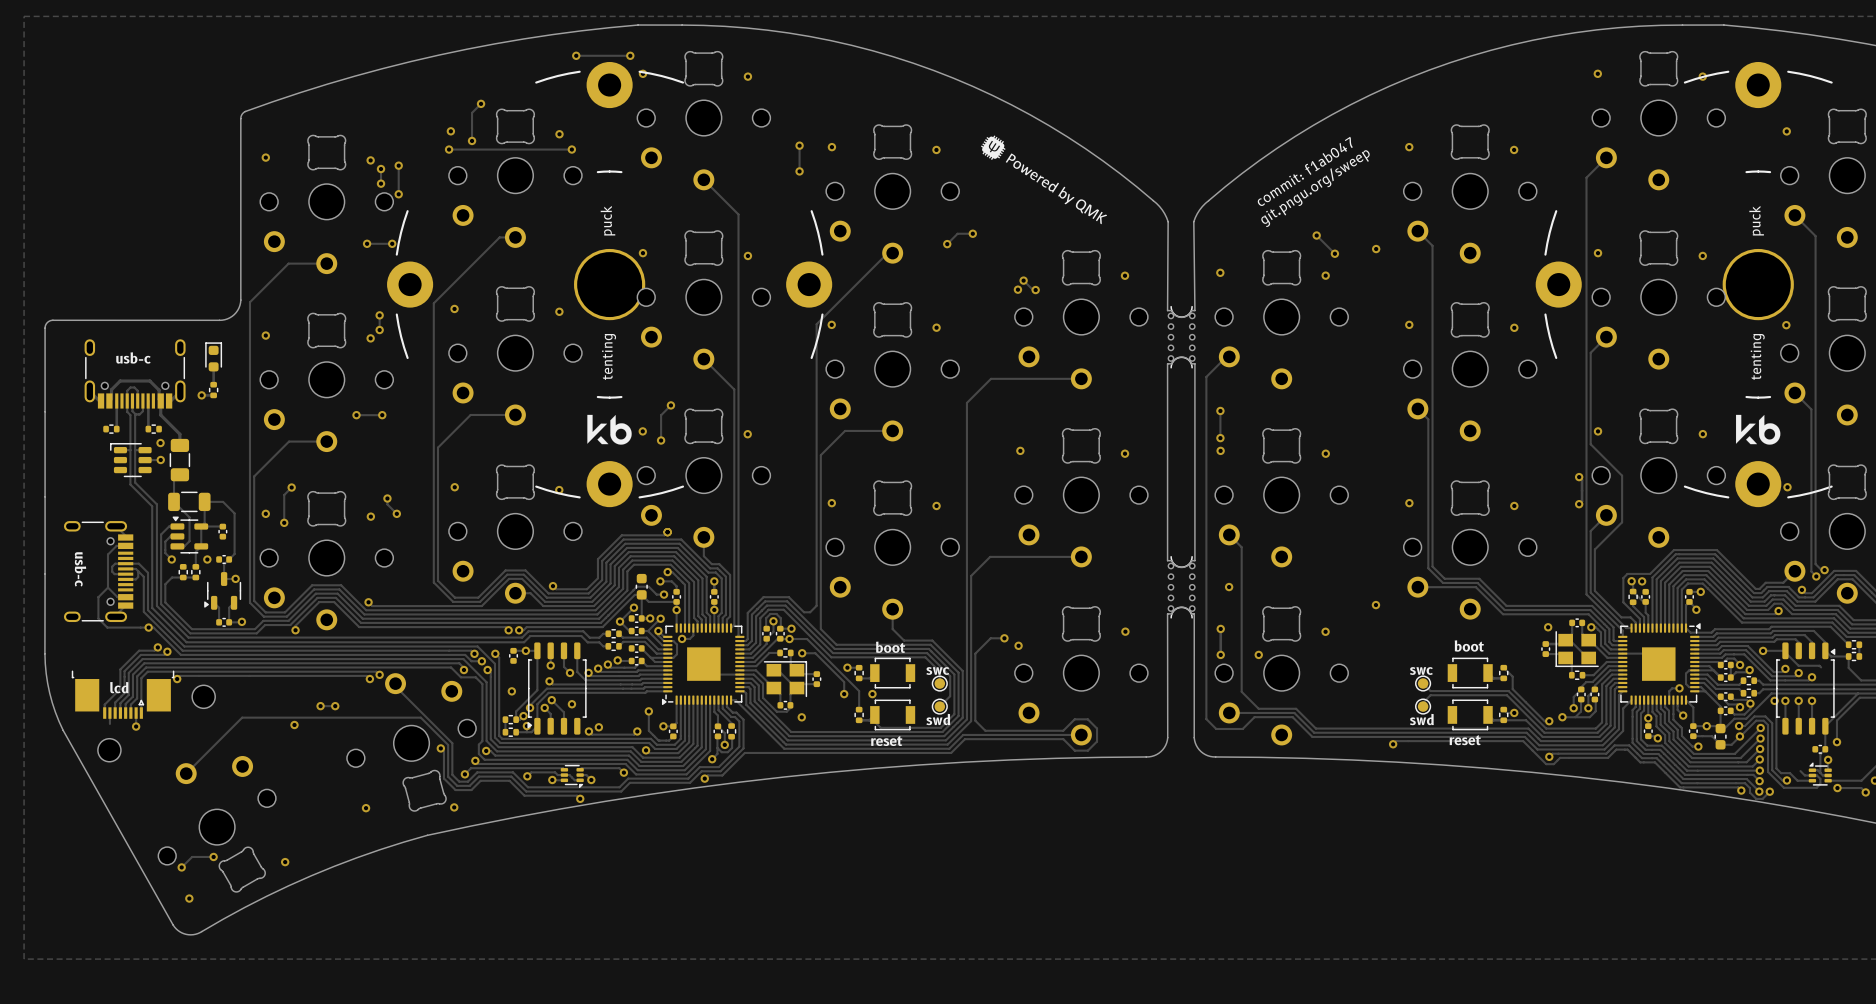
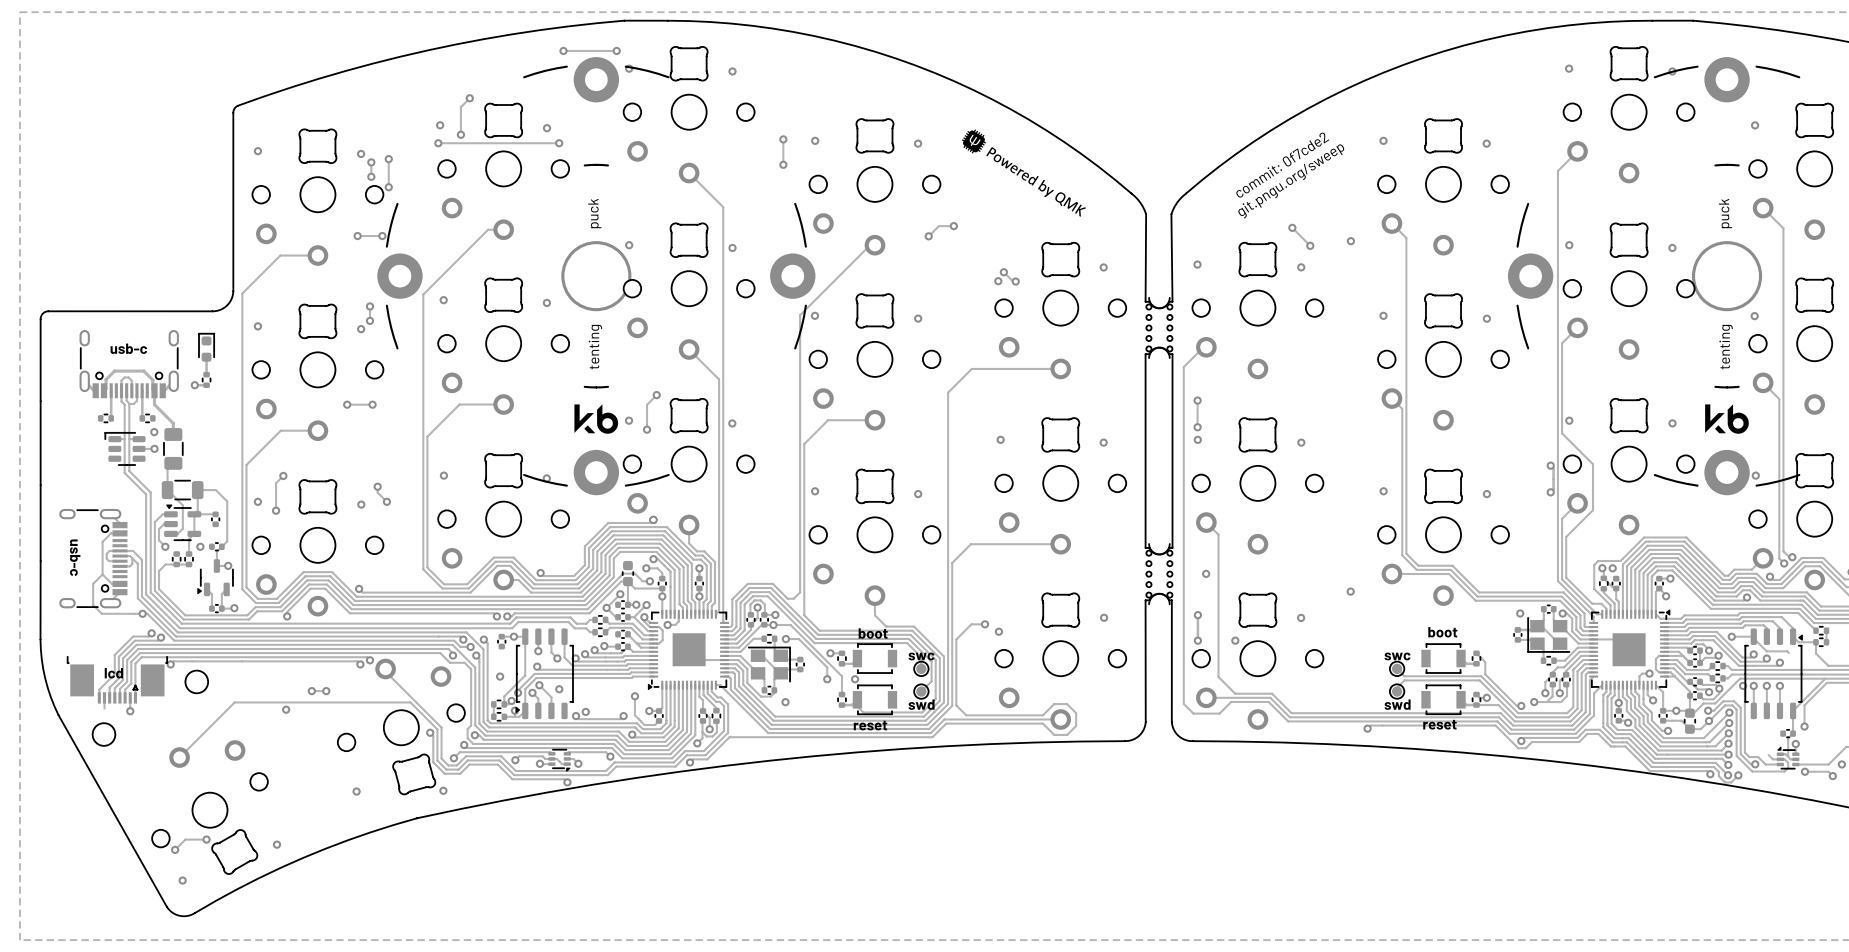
text: commit: f1ab047 (1305, 171) -> commit: 0f7cde2 (1282, 165)

